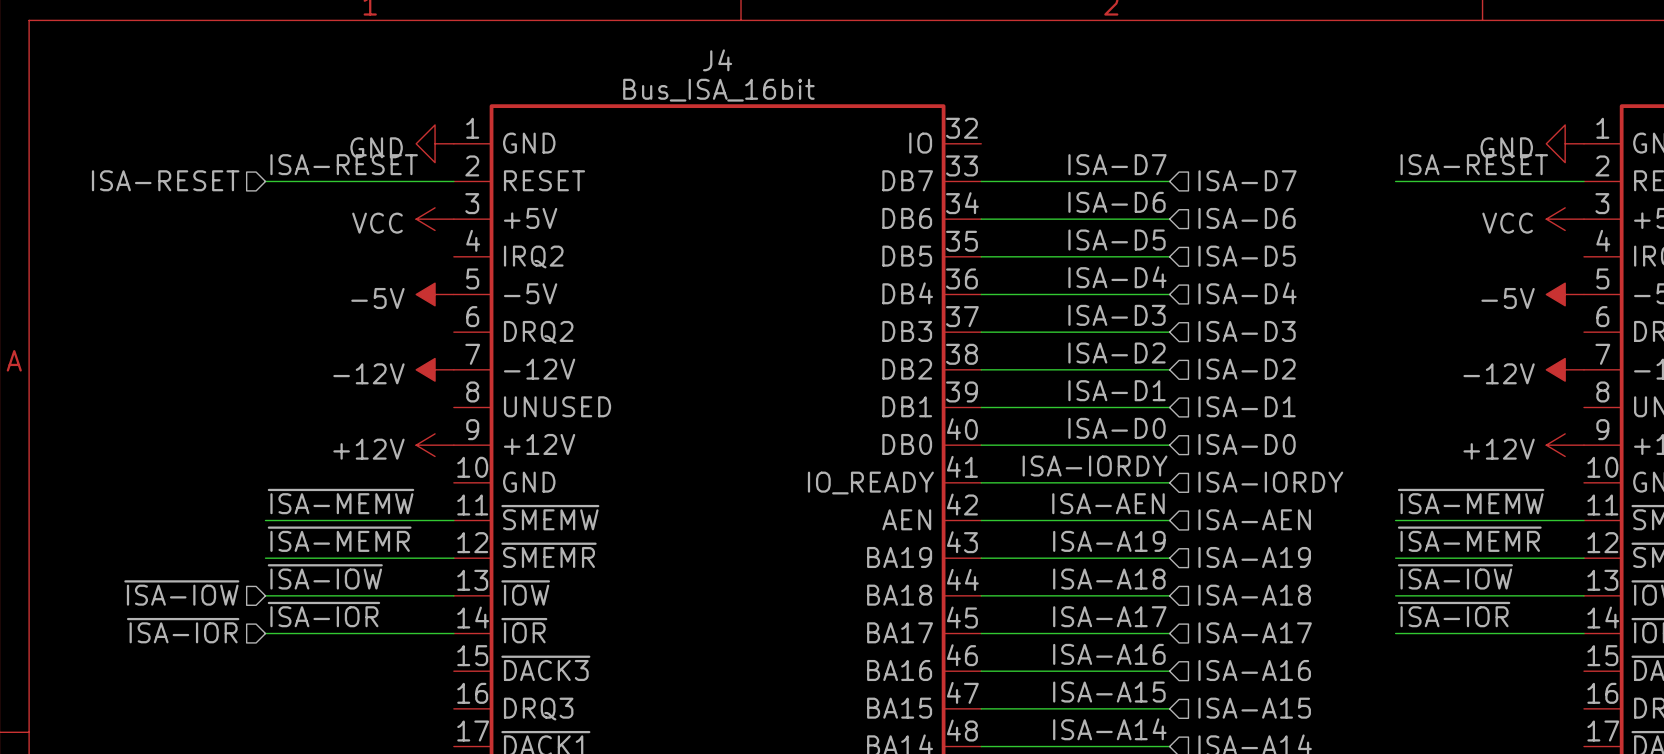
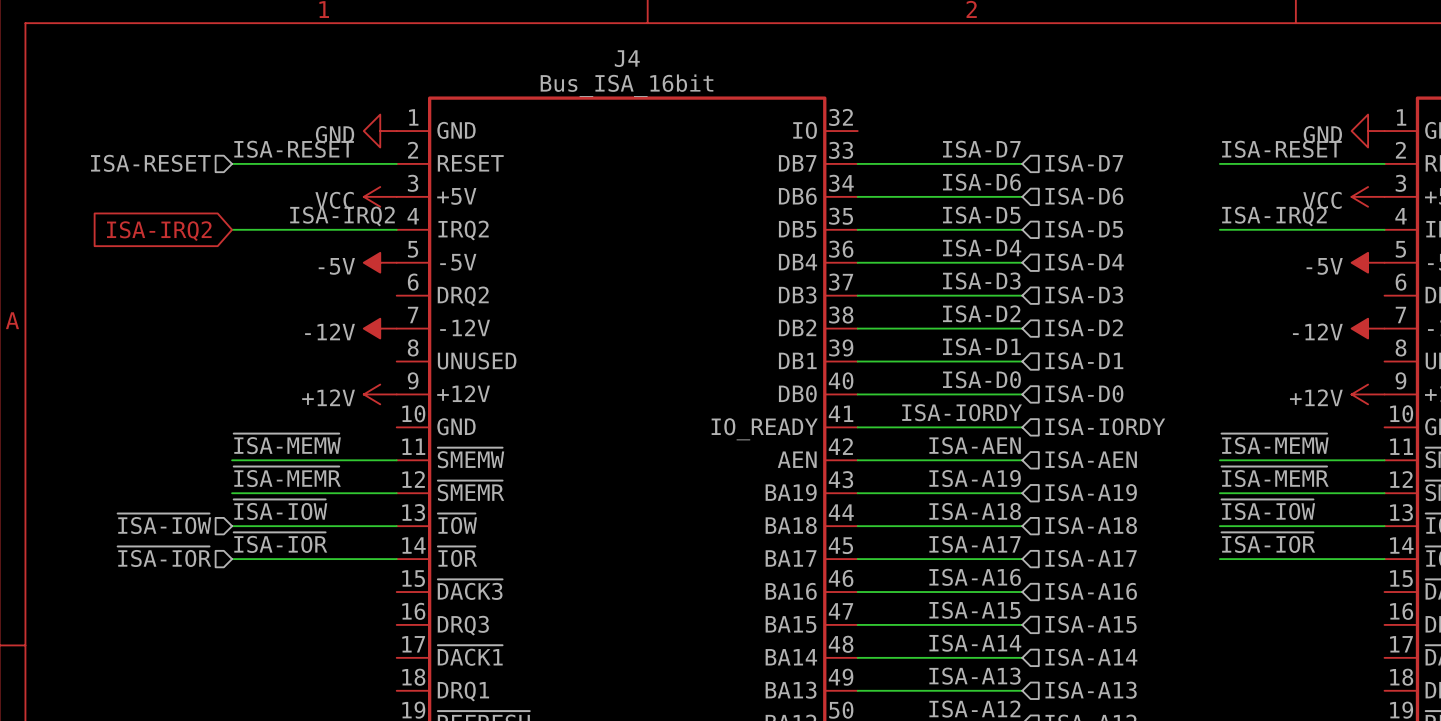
label: none -> ISA-IRQ2 (342, 216)
label: none -> ISA-IRQ2 (1274, 216)
wire: none -> (232, 229) (396, 229)
wire: none -> (1219, 229) (1384, 229)
global label: none -> ISA-IRQ2 (159, 231)

